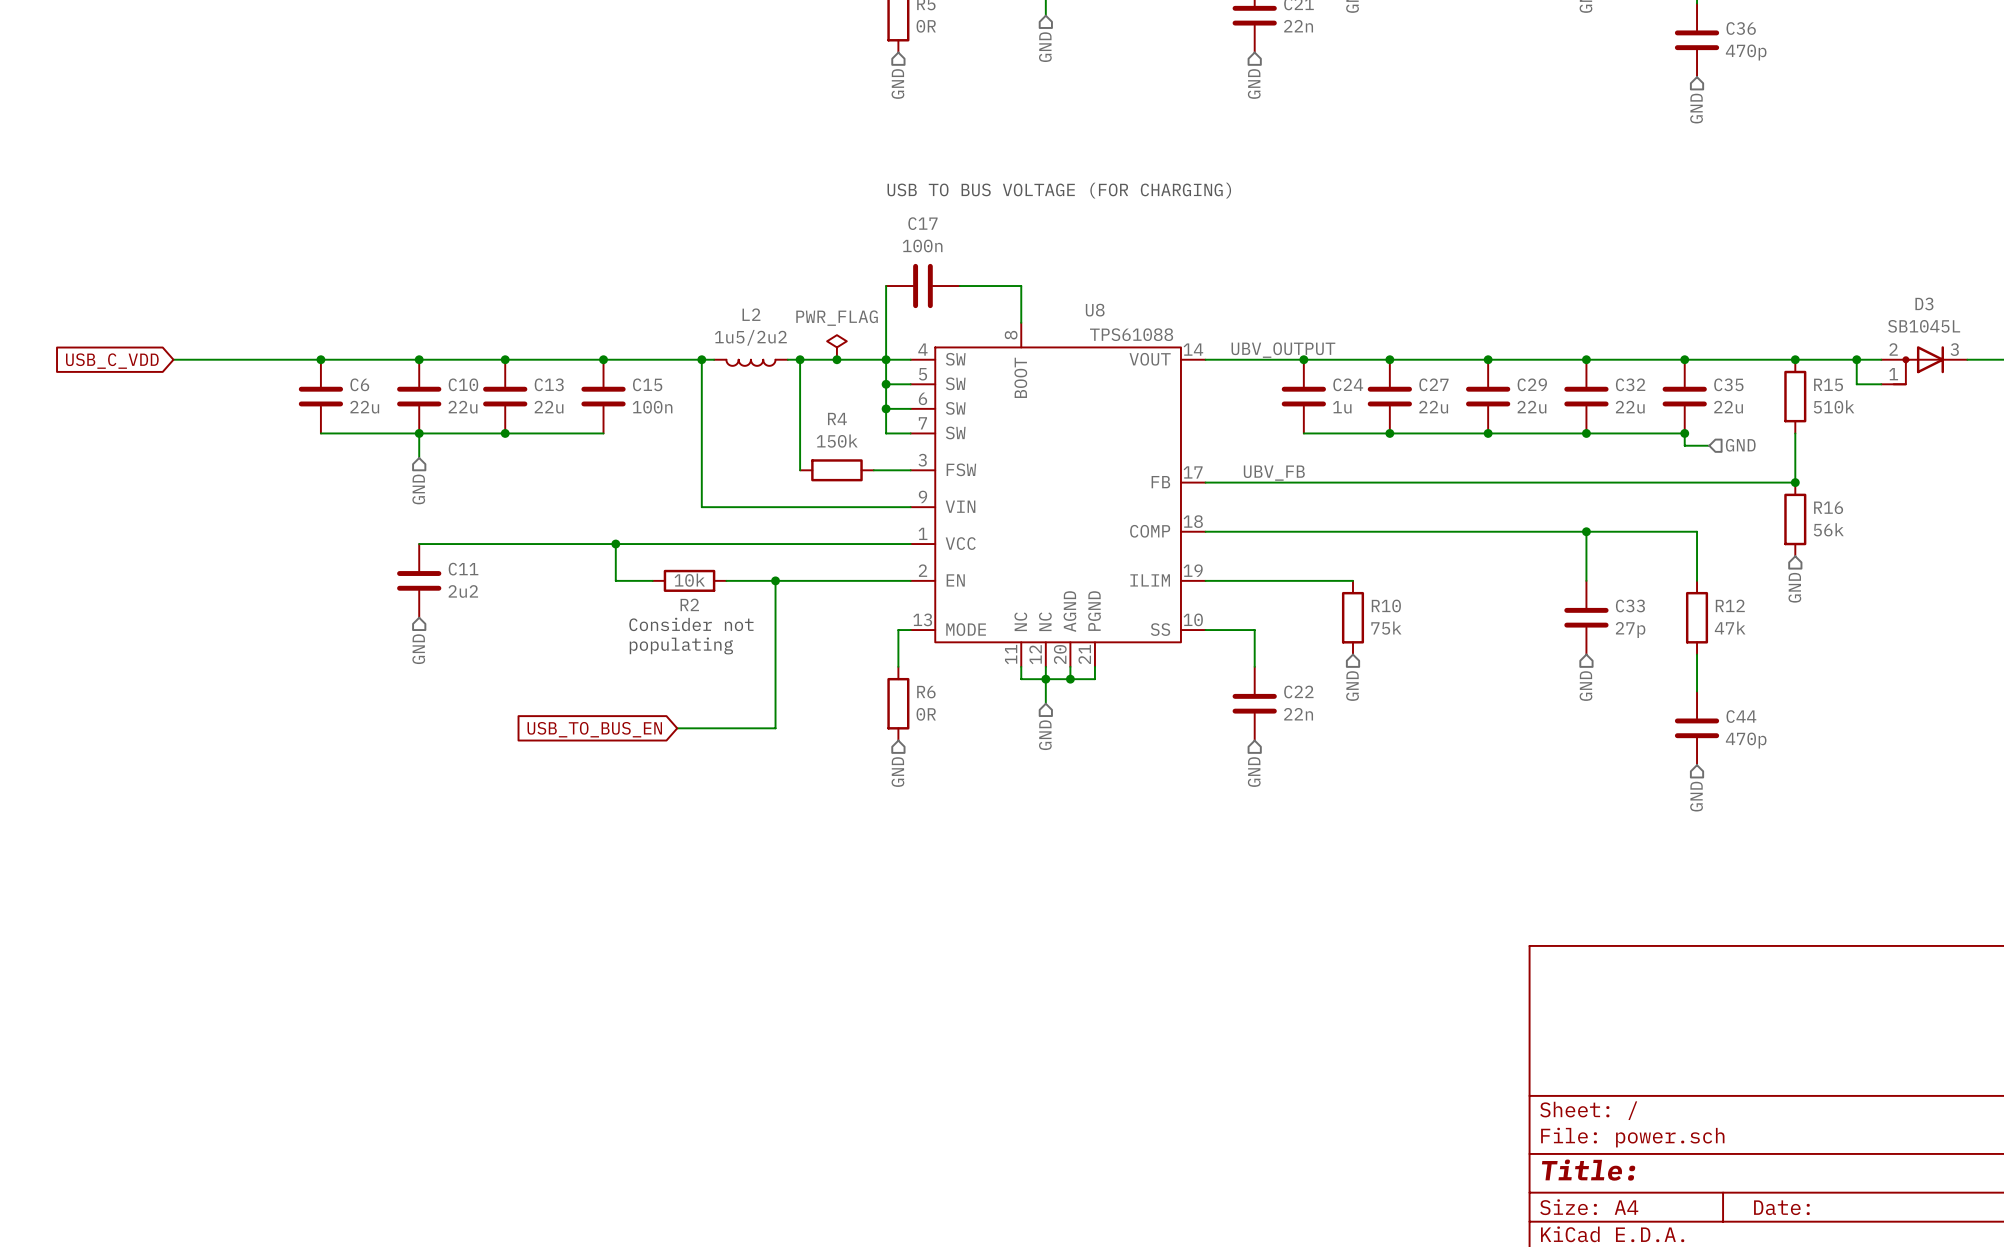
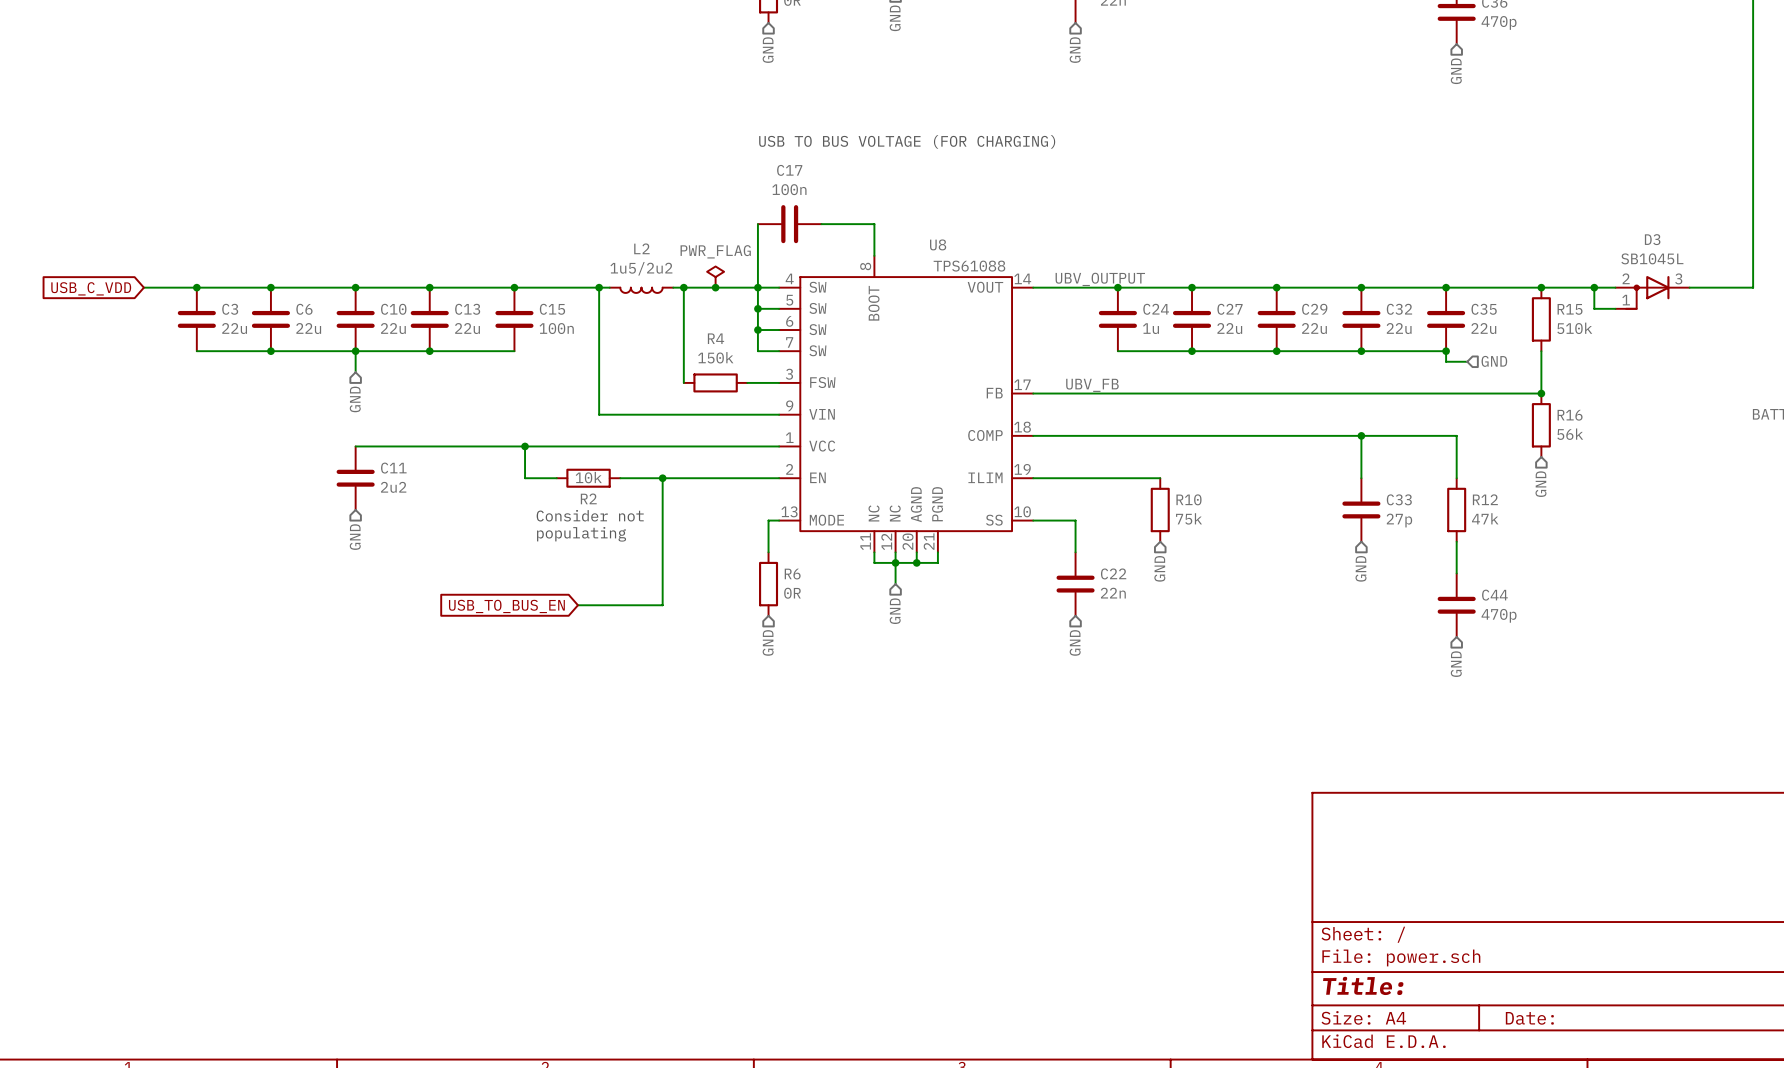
junction: none -> (196, 287)
C3: none -> 22u (196, 319)
wire: none -> (196, 351) (270, 351)
junction: none -> (270, 351)

